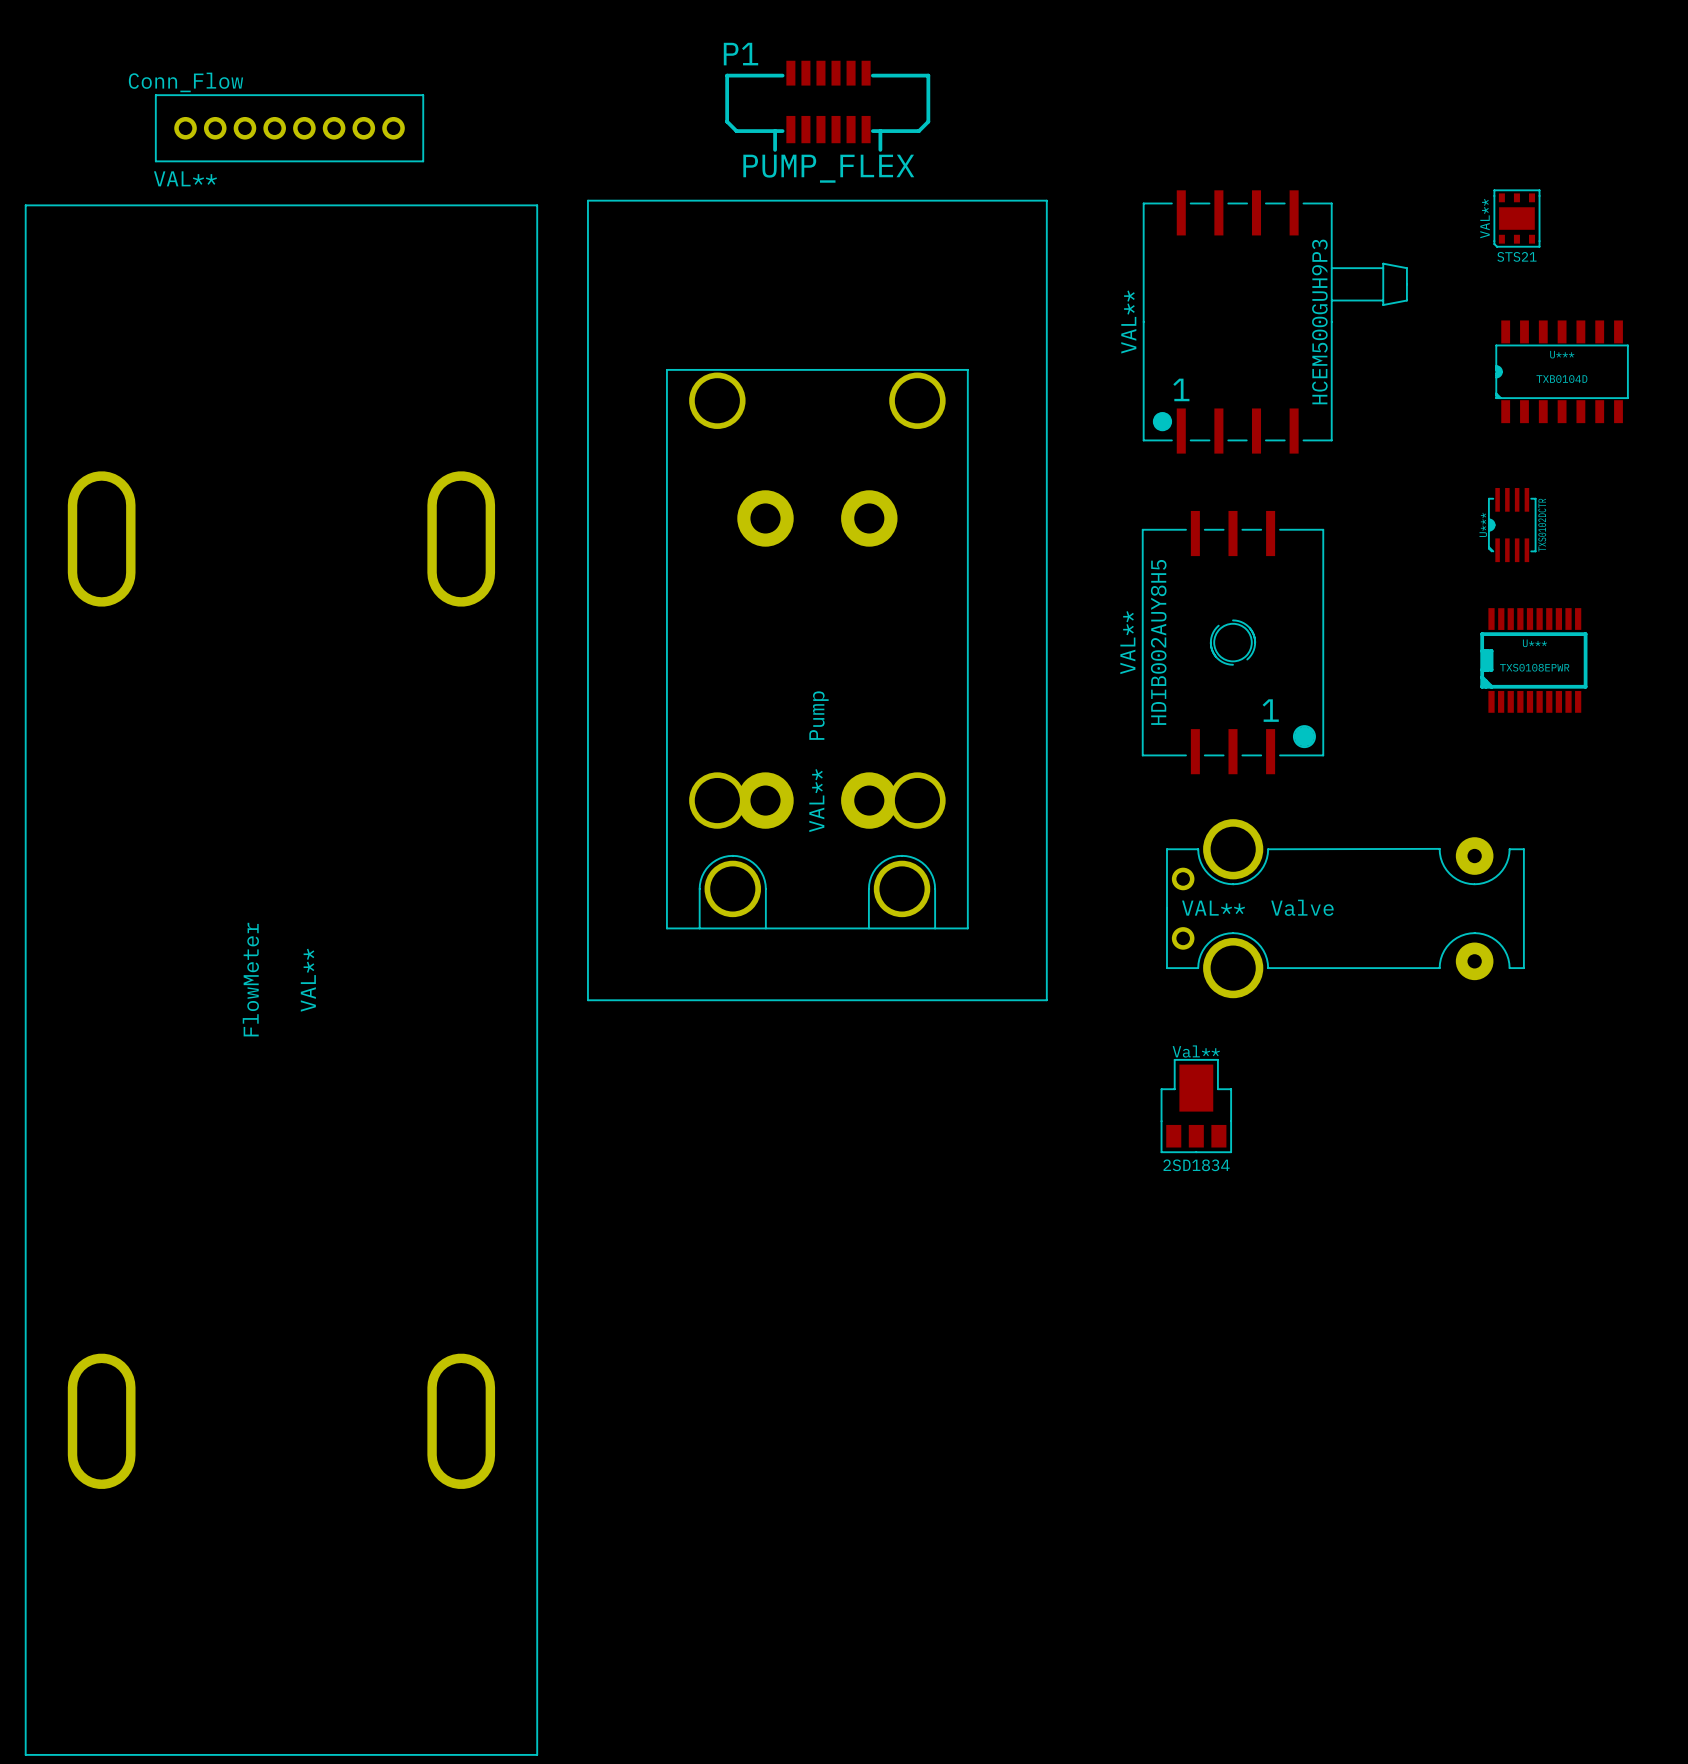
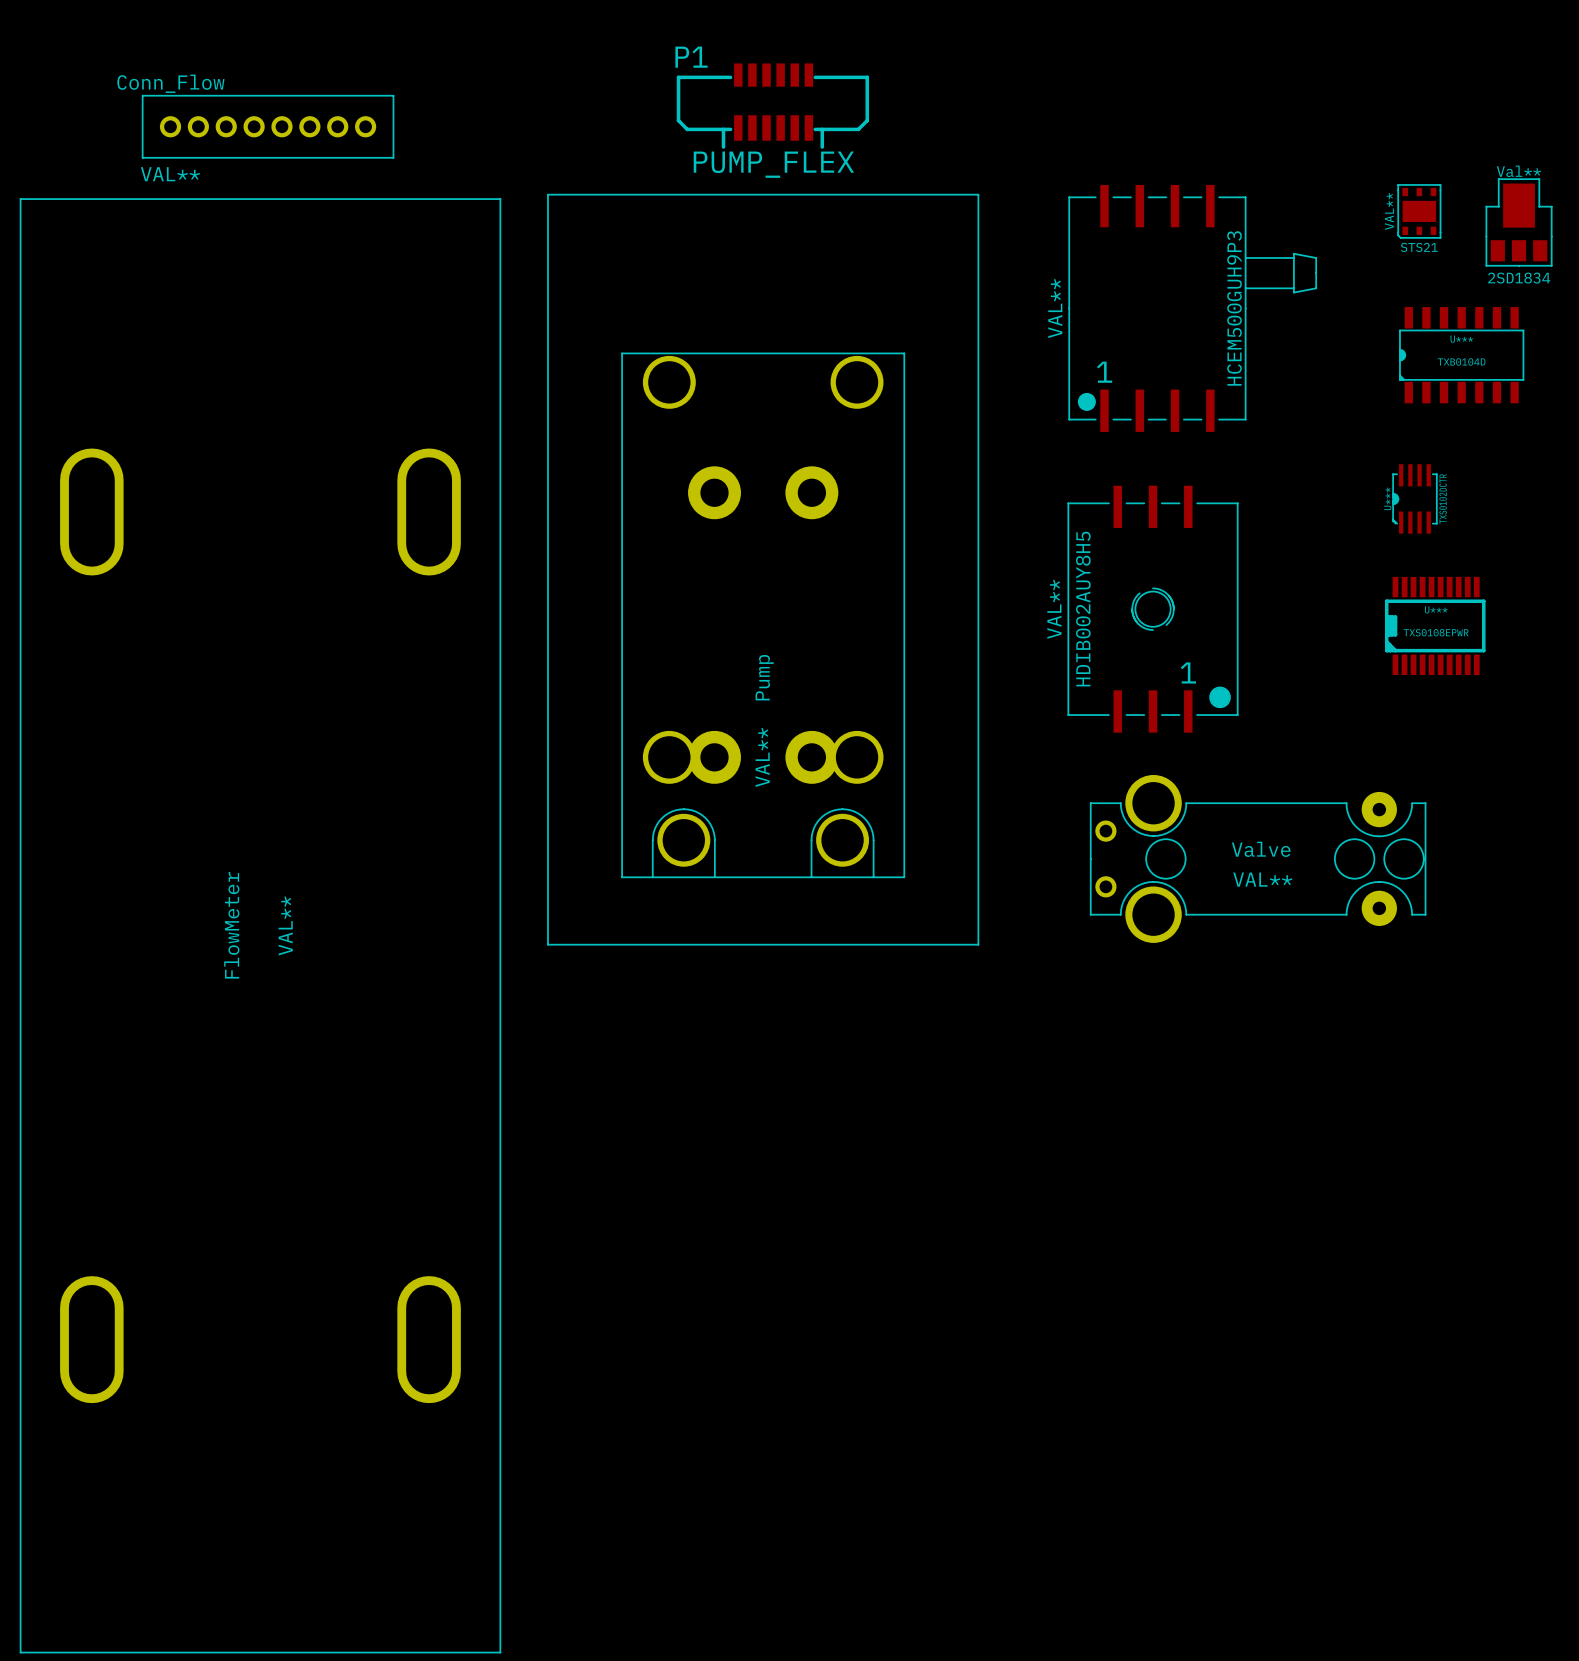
Valve footprint: [1166, 819, 1525, 999] -> [1089, 775, 1427, 943]
Valve name position: Valve (1302, 907) -> Valve (1261, 849)
Valve value position: VAL** (1213, 908) -> VAL** (1262, 879)
2SD1834 position: (1196, 1106) -> (1519, 222)

